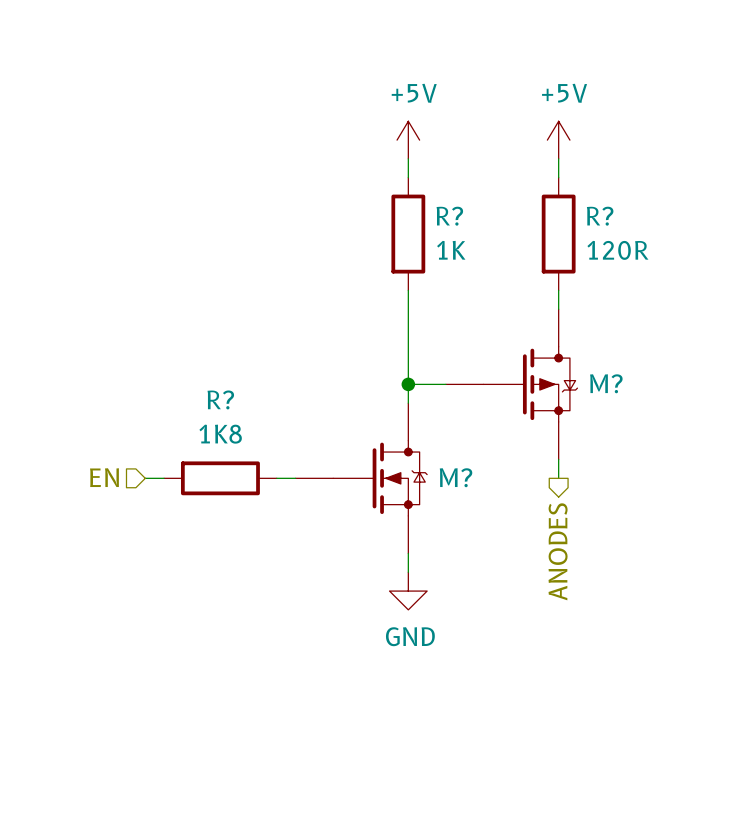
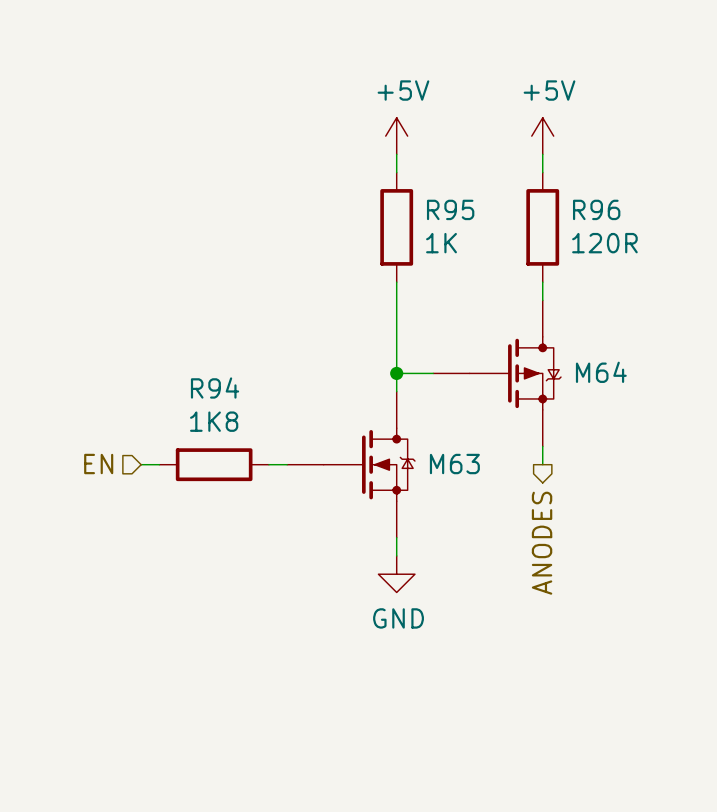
R? name: R? (449, 216) -> R95 (450, 209)
R? name: R? (600, 216) -> R96 (596, 209)
M? name: M? (606, 383) -> M64 (601, 372)
R? name: R? (220, 399) -> R94 (215, 388)
M? name: M? (456, 477) -> M63 (454, 464)

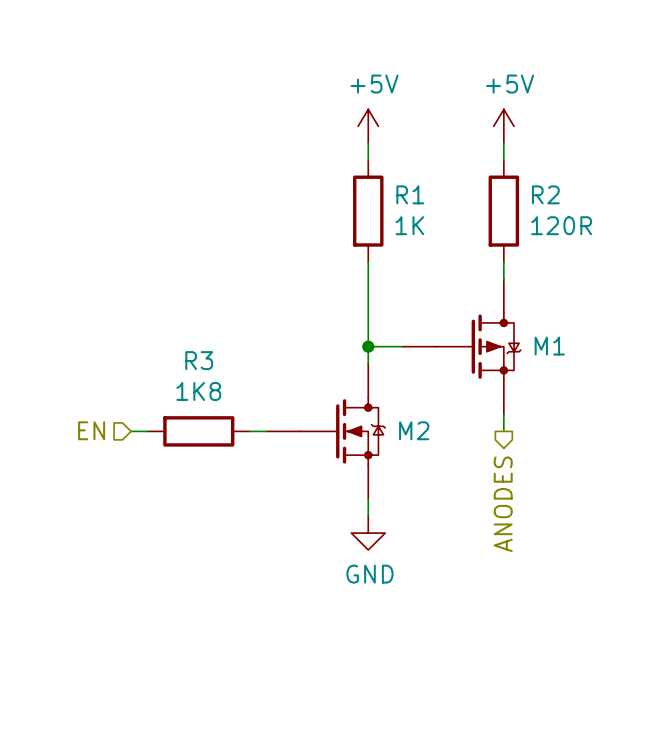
R95 name: R95 (450, 209) -> R1 (410, 194)
R96 name: R96 (596, 209) -> R2 (545, 194)
M64 name: M64 (601, 372) -> M1 (549, 346)
R94 name: R94 (215, 388) -> R3 (199, 360)
M63 name: M63 (454, 464) -> M2 (414, 430)

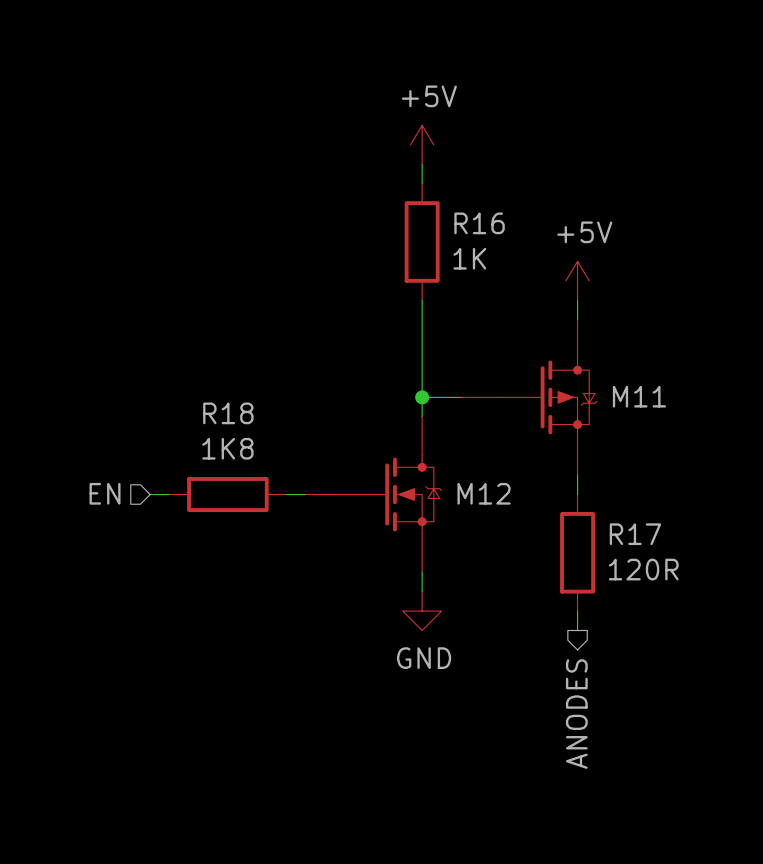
power symbol position: +5V (503, 126) -> +5V (577, 280)
wire: (503, 143) (503, 160) -> none
R1 name: R1 (410, 194) -> R16 (479, 223)
R2: 120R (503, 211) -> none
M1 name: M1 (549, 346) -> M11 (639, 396)
R3 name: R3 (199, 360) -> R18 (228, 413)
M2 name: M2 (414, 430) -> M12 (484, 493)
R17: none -> 120R (577, 552)
hierarchical label position: ANODES (503, 504) -> ANODES (576, 714)
wire: none -> (577, 611) (577, 630)

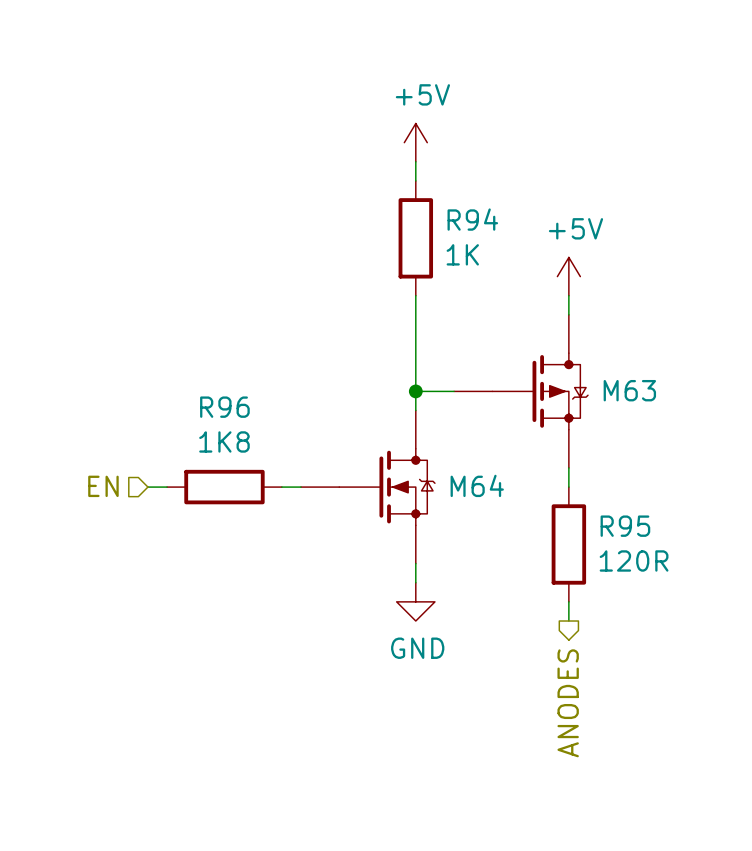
R16 name: R16 (479, 223) -> R94 (472, 219)
M11 name: M11 (639, 396) -> M63 (629, 390)
R18 name: R18 (228, 413) -> R96 (224, 407)
M12 name: M12 (484, 493) -> M64 (477, 485)
R17 name: R17 (635, 534) -> R95 (625, 526)

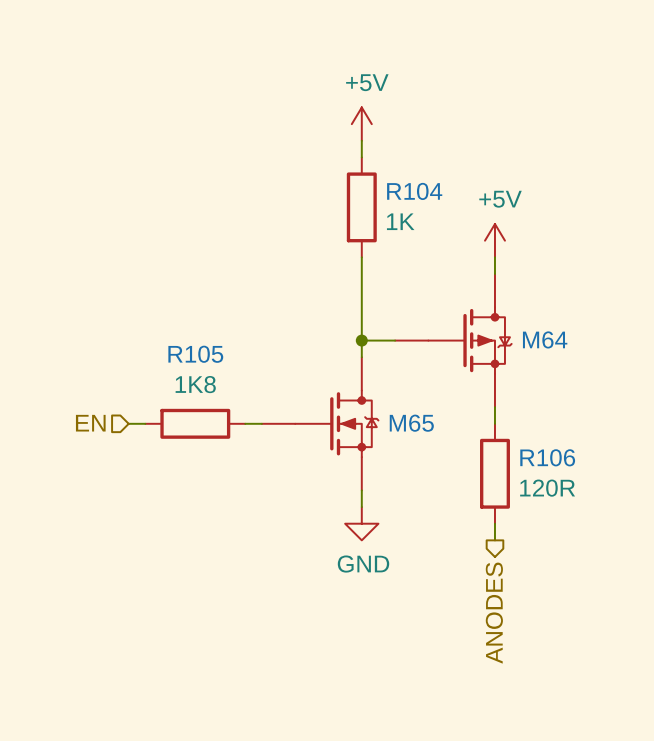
R94 name: R94 (472, 219) -> R104 (414, 191)
M63 name: M63 (629, 390) -> M64 (545, 339)
R96 name: R96 (224, 407) -> R105 (195, 354)
M64 name: M64 (477, 485) -> M65 (411, 423)
R95 name: R95 (625, 526) -> R106 (547, 457)

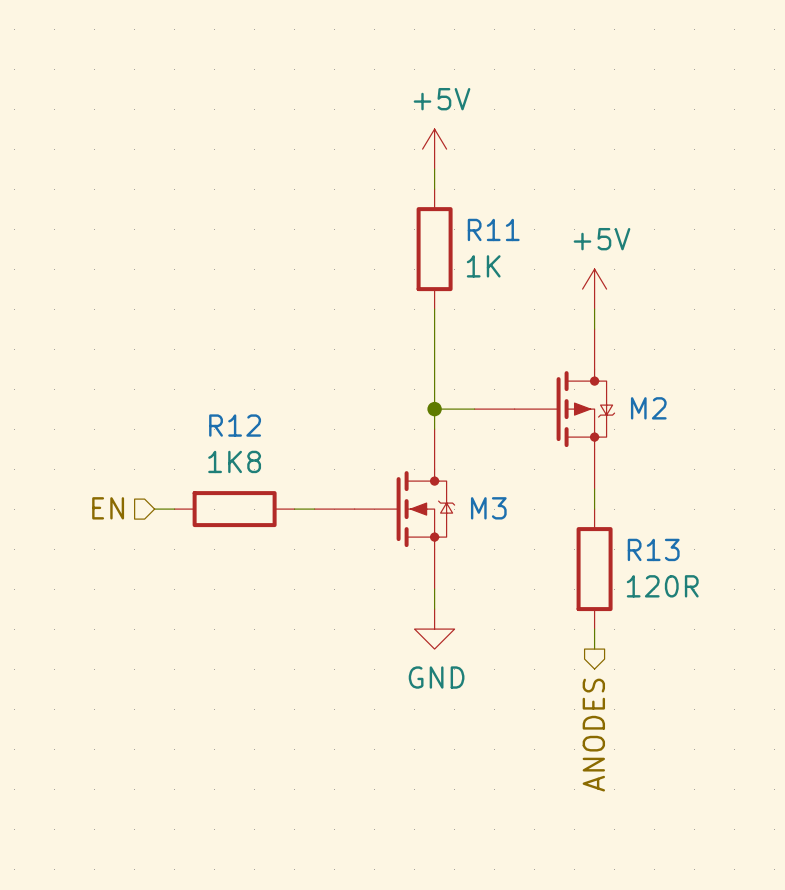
R104 name: R104 (414, 191) -> R11 (493, 229)
M64 name: M64 (545, 339) -> M2 (648, 408)
R105 name: R105 (195, 354) -> R12 (235, 425)
M65 name: M65 (411, 423) -> M3 (488, 508)
R106 name: R106 (547, 457) -> R13 (653, 549)

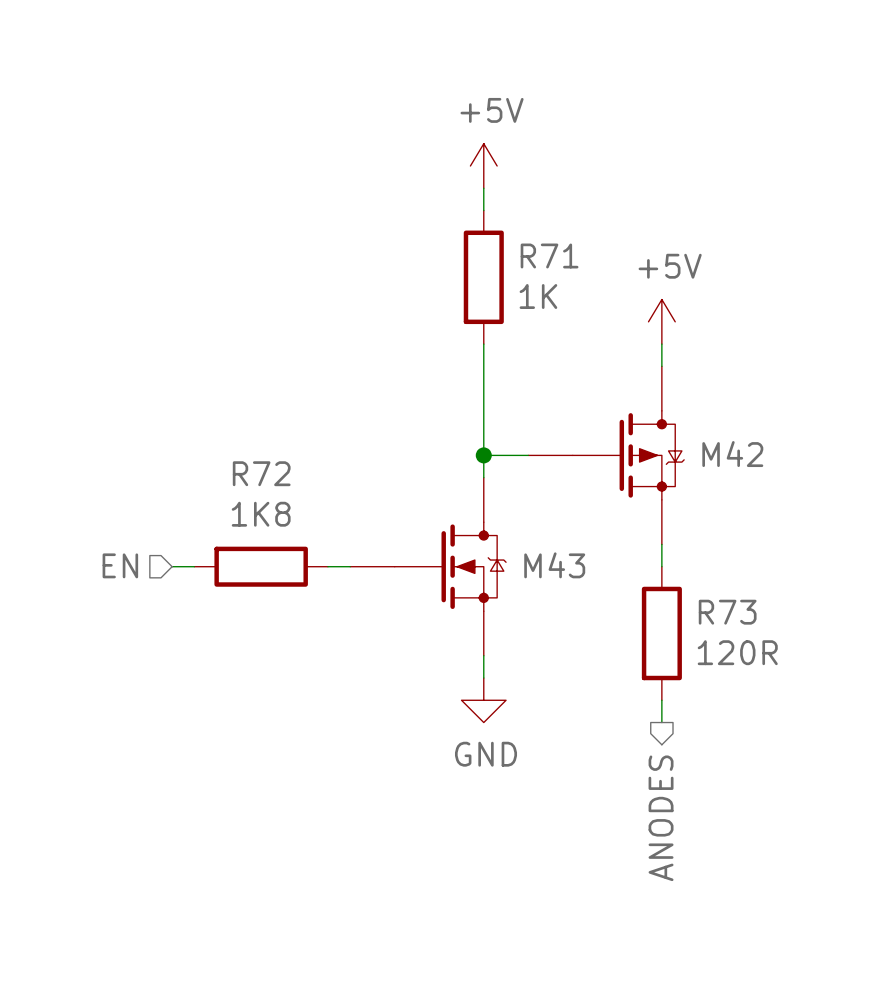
R11 name: R11 (493, 229) -> R71 (549, 255)
M2 name: M2 (648, 408) -> M42 (732, 454)
R12 name: R12 (235, 425) -> R72 (261, 473)
M3 name: M3 (488, 508) -> M43 (554, 565)
R13 name: R13 (653, 549) -> R73 (727, 612)

